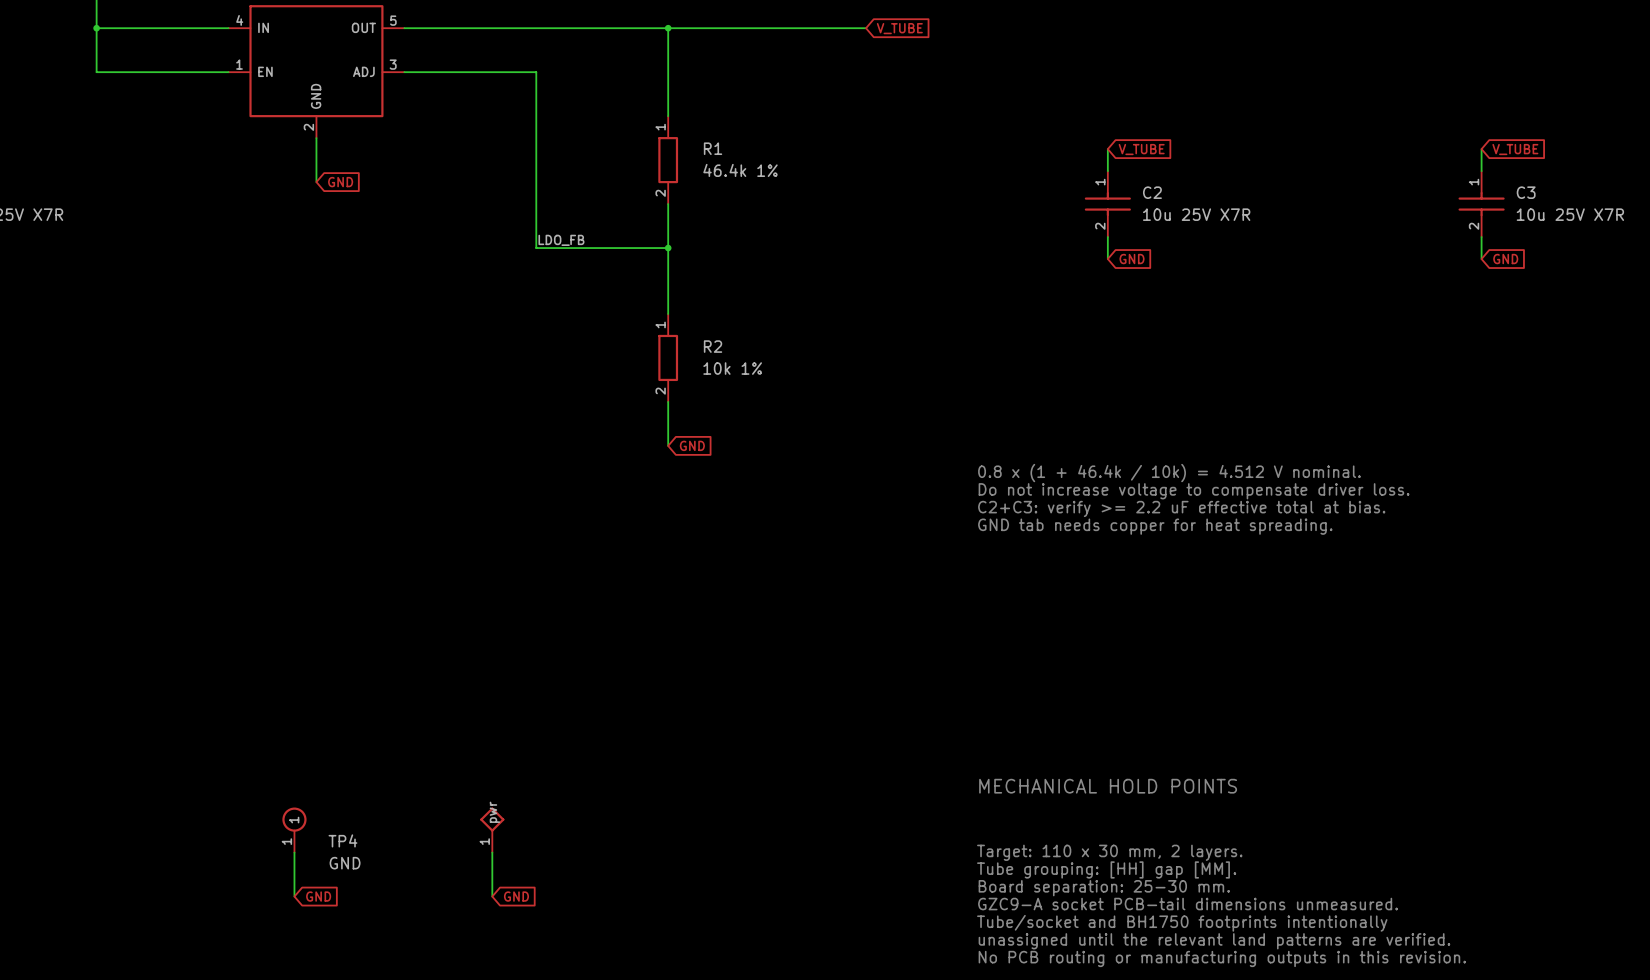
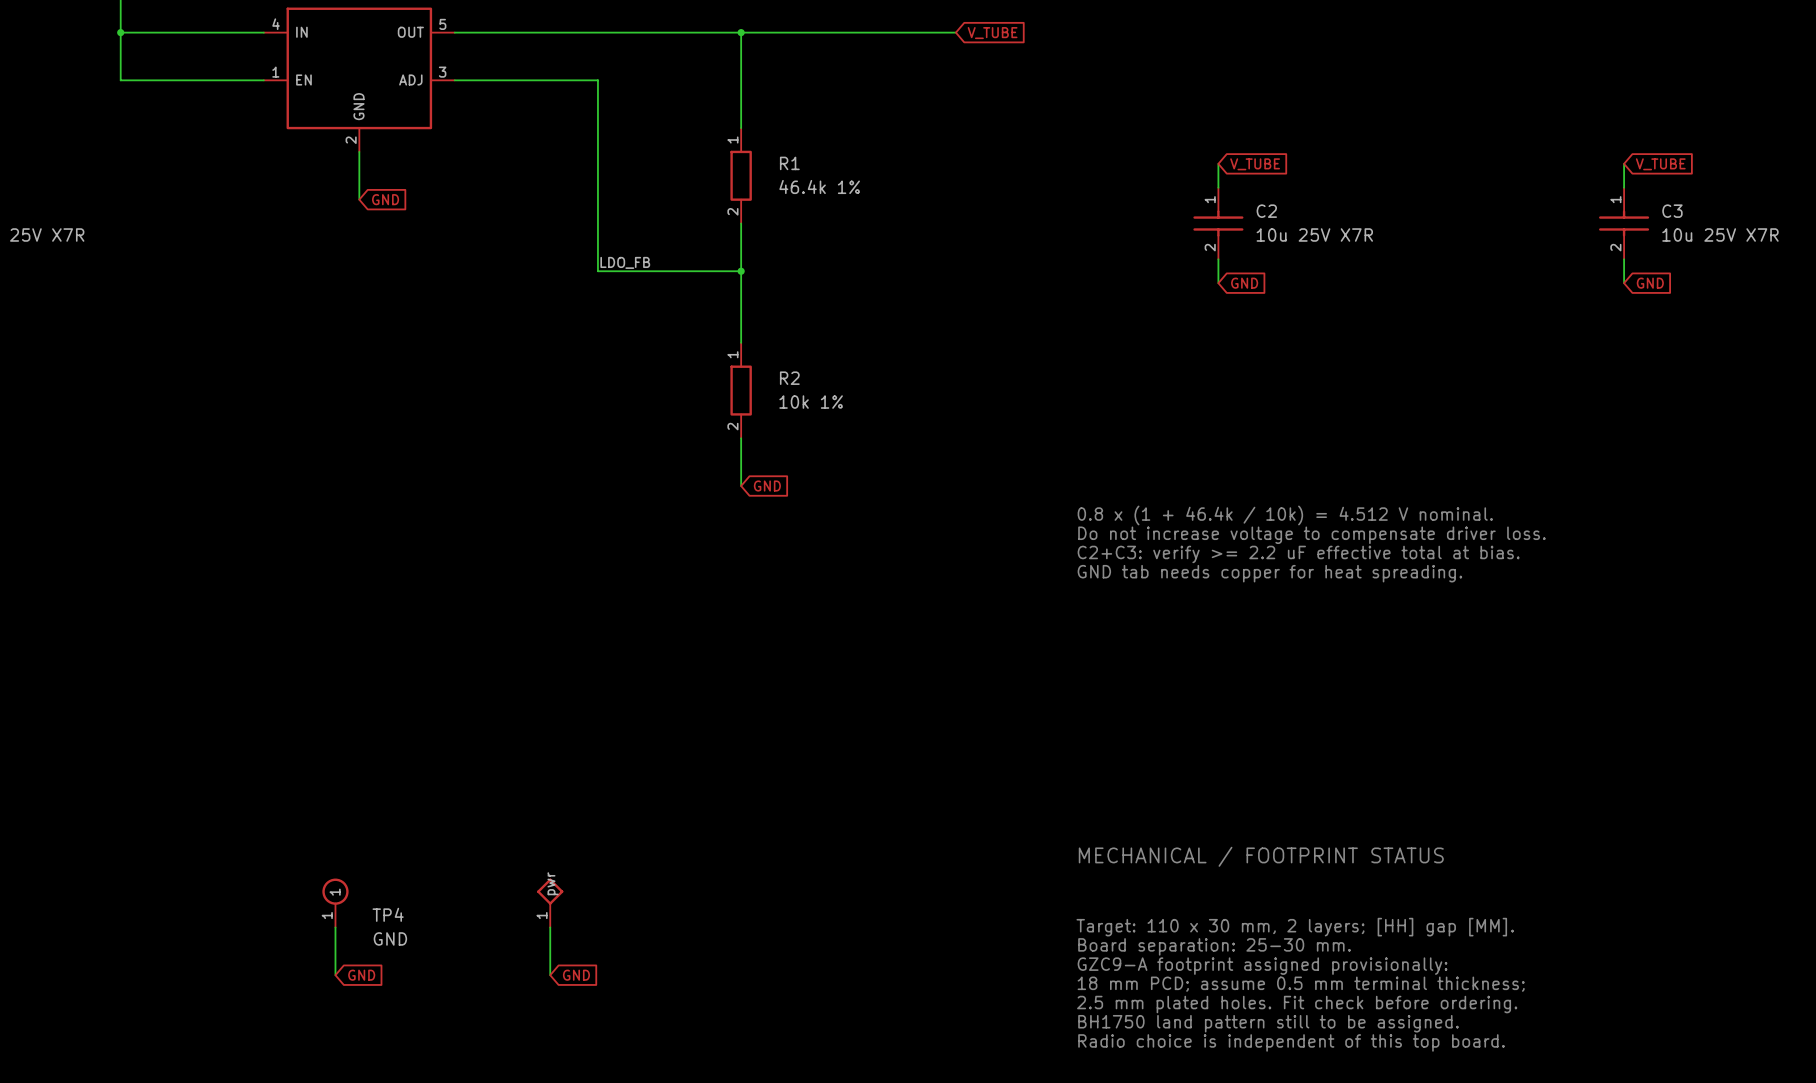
text: MECHANICAL HOLD POINTS (1108, 786) -> MECHANICAL / FOOTPRINT STATUS (1261, 856)
text: Target: 110 x 30 mm, 2 layers. (1109, 852) -> Target: 110 x 30 mm, 2 layers; [HH] gap [MM]. (1295, 927)
text: Tube grouping: [HH] gap [MM]. (1106, 869) -> Board separation: 25-30 mm. (1214, 946)
text: Board separation: 25-30 mm. (1104, 888) -> GZC9-A footprint assigned provisionally: (1262, 966)
text: GZC9-A socket PCB-tail dimensions unmeasured. (1188, 904) -> 18 mm PCD; assume 0.5 mm terminal thickness; (1301, 984)
text: Tube/socket and BH1750 footprints intentionally (1182, 923) -> 2.5 mm plated holes. Fit check before ordering. (1297, 1004)
text: unassigned until the relevant land patterns are verified. (1214, 941) -> BH1750 land pattern still to be assigned. (1268, 1023)
text: No PCB routing or manufacturing outputs in this revision. (1222, 958) -> Radio choice is independent of this top board. (1291, 1042)

